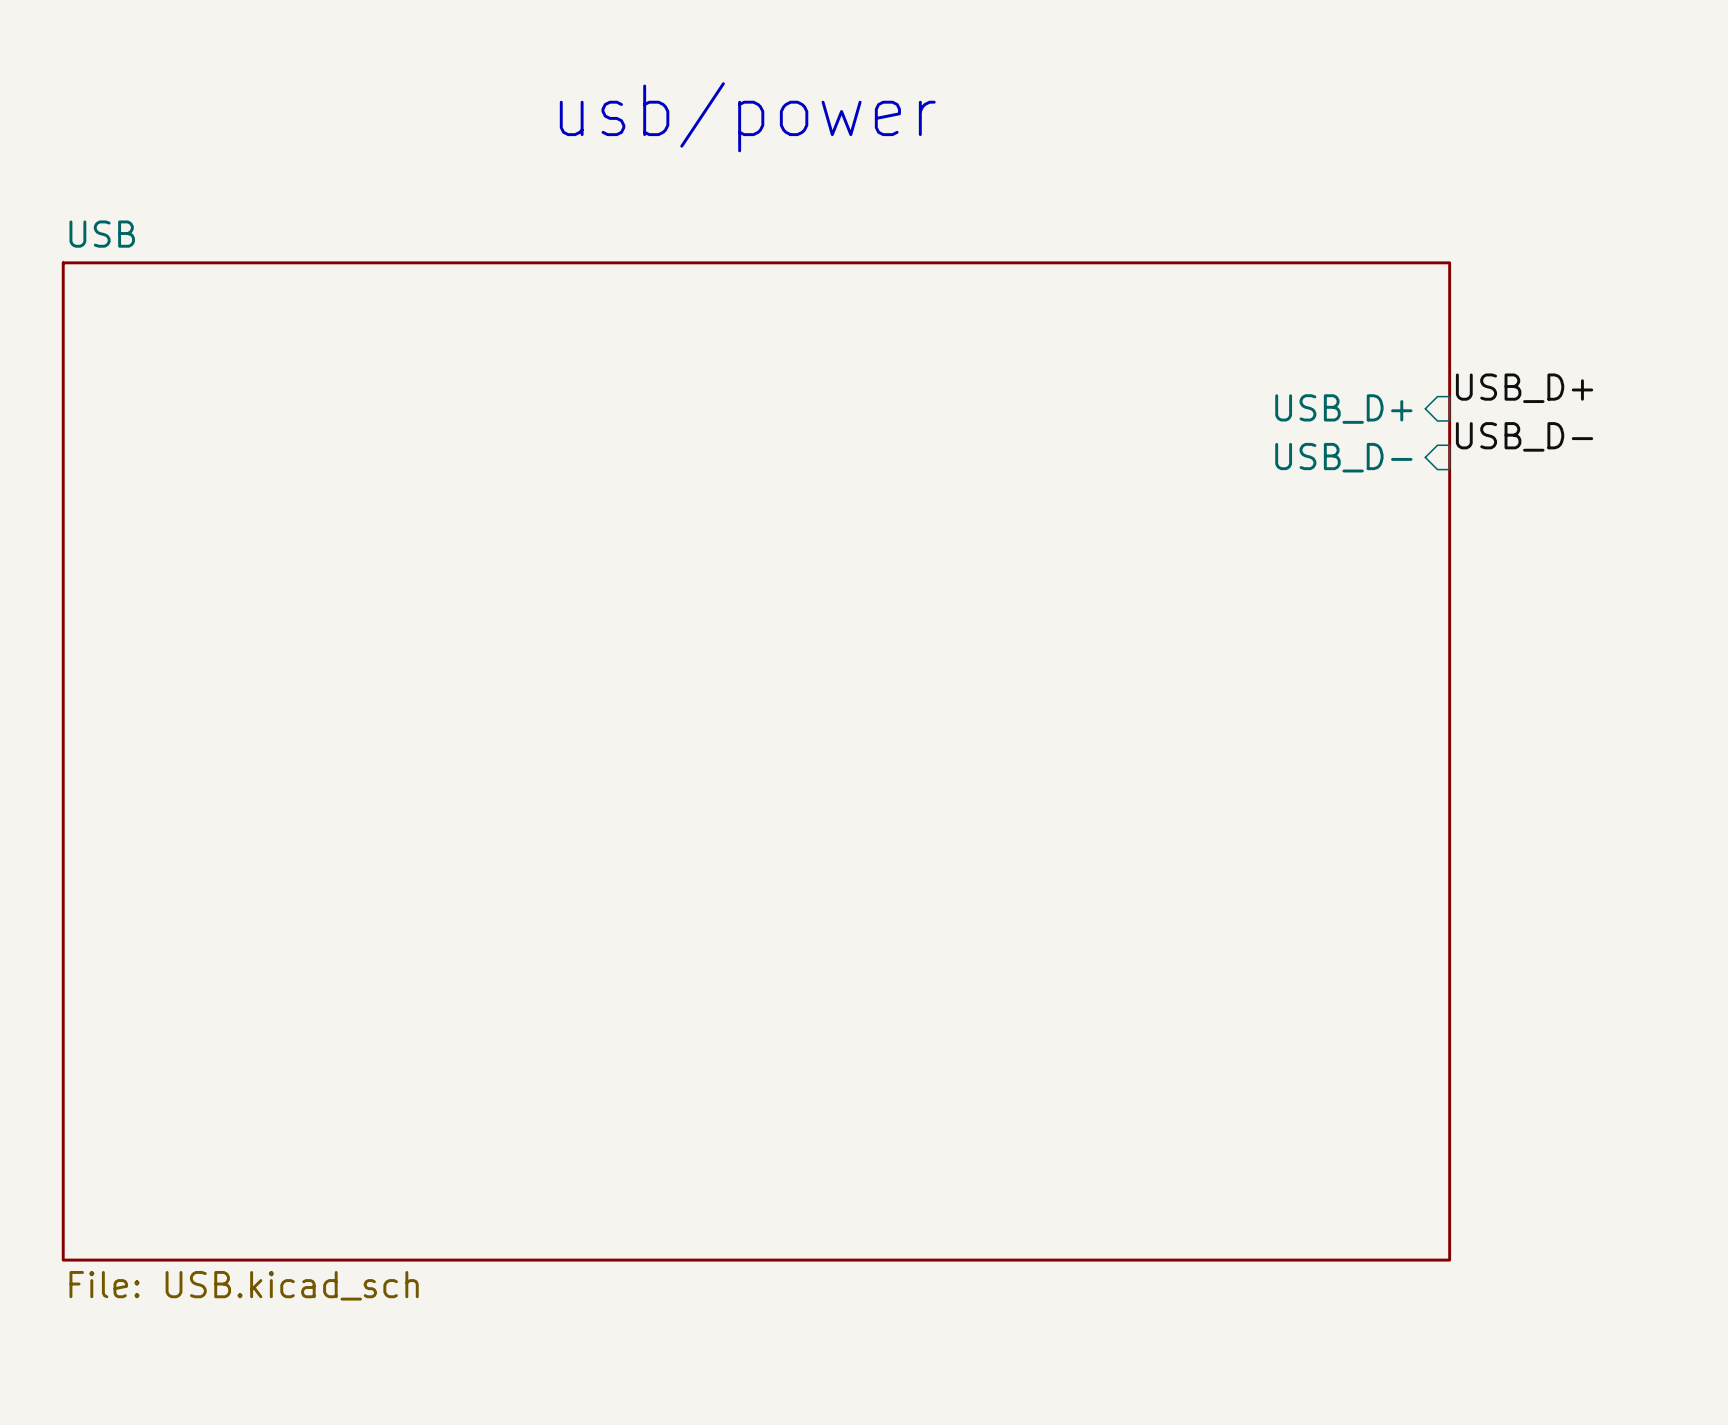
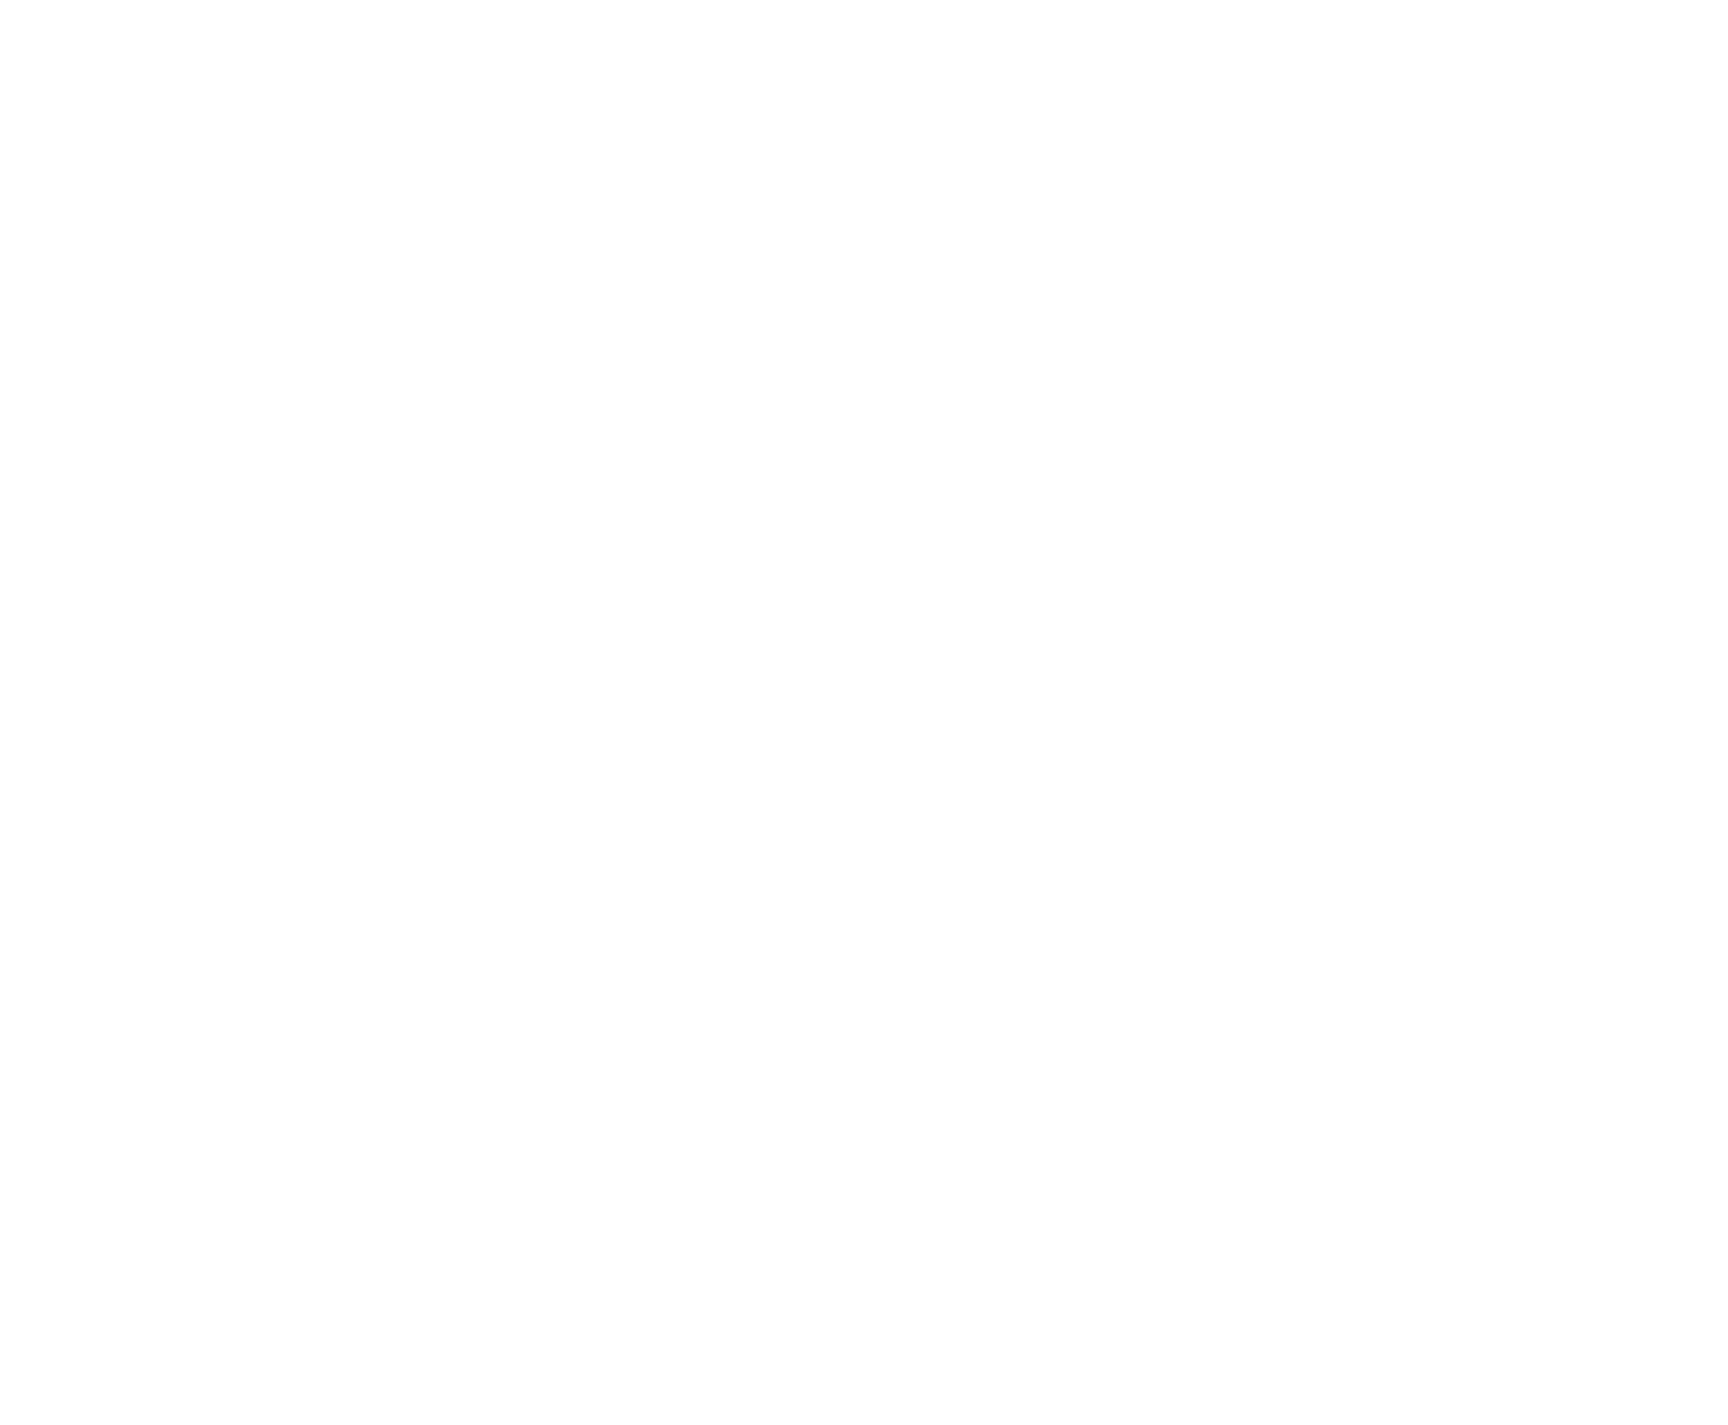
text: usb/power (747, 117) -> none
label: USB_D+ (1524, 388) -> none
sheet pin: USB_D+ (1343, 409) -> none
label: USB_D- (1524, 436) -> none
sheet pin: USB_D- (1343, 457) -> none
sheet USB: File: USB.kicad_sch (756, 761) -> none

